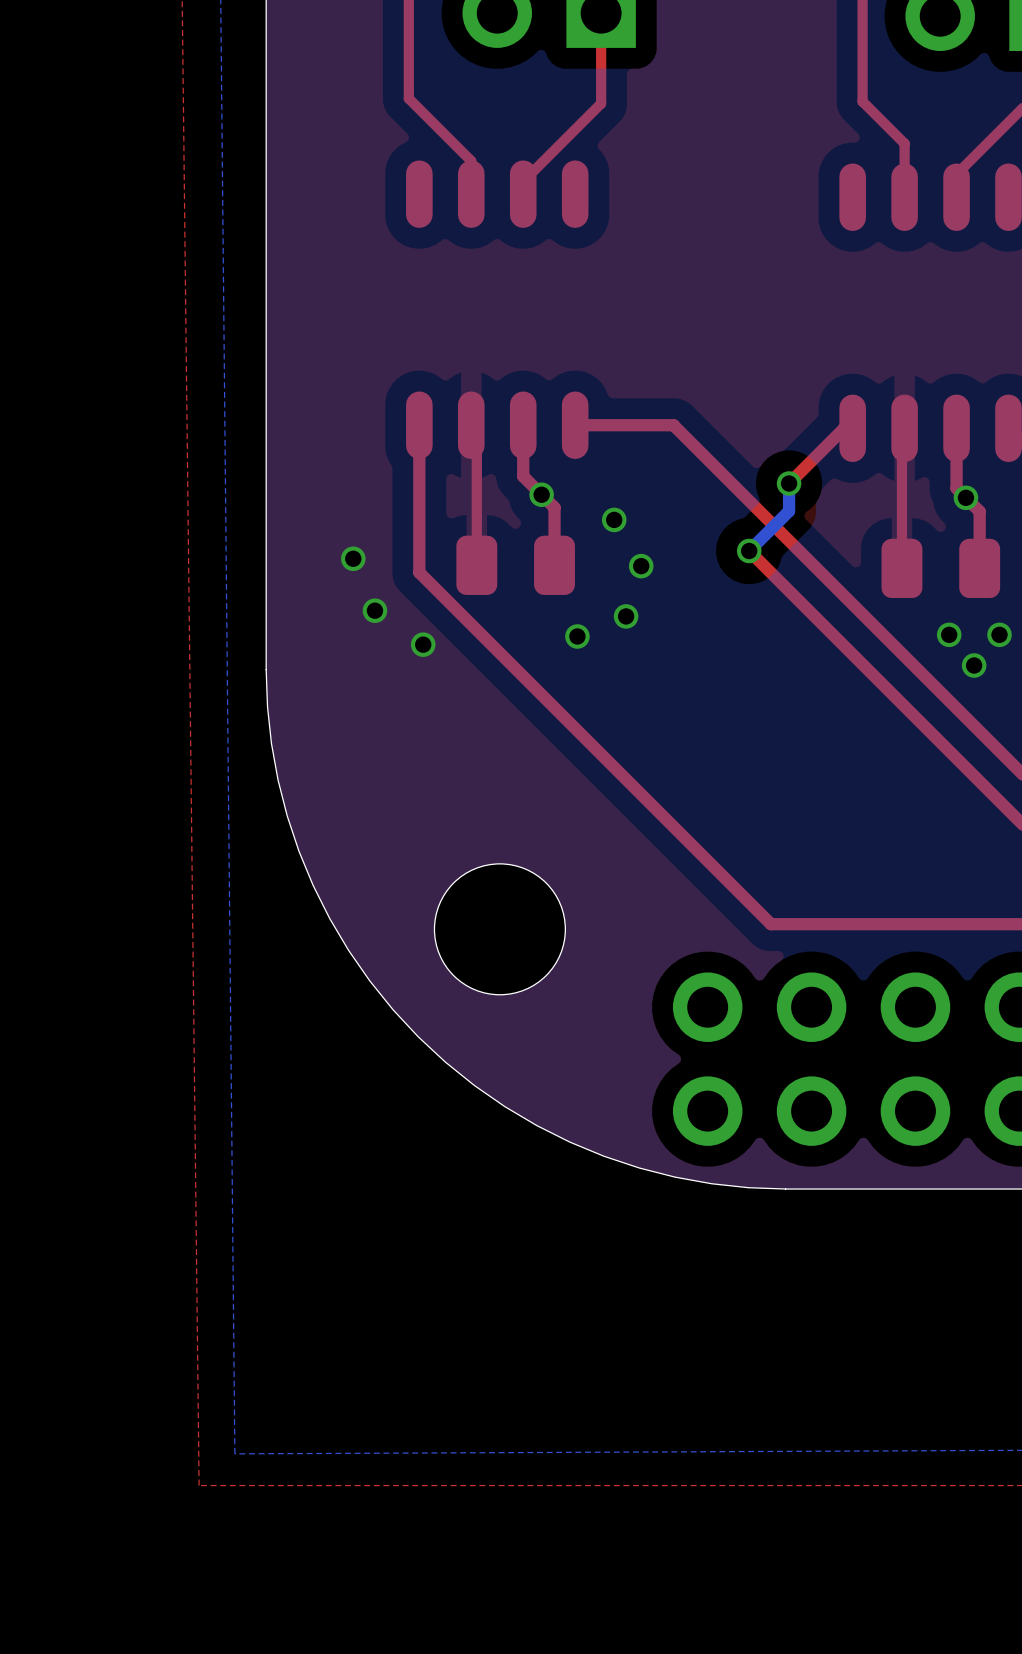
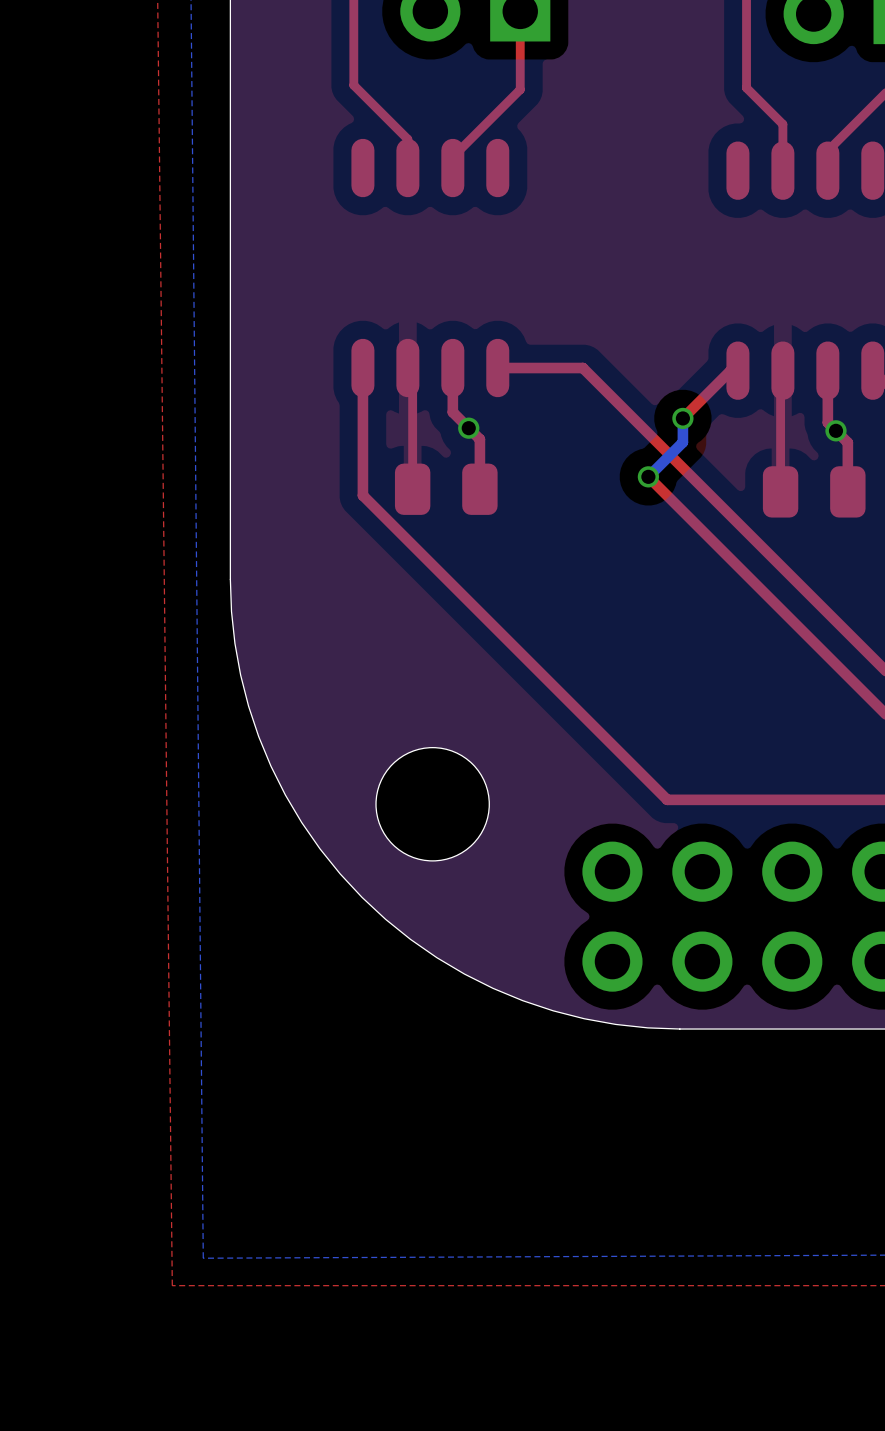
via: (614, 519) -> none
via: (353, 558) -> none
via: (641, 566) -> none
via: (374, 610) -> none
via: (626, 616) -> none
via: (949, 634) -> none
via: (999, 634) -> none
via: (577, 636) -> none
via: (423, 644) -> none
via: (974, 665) -> none

